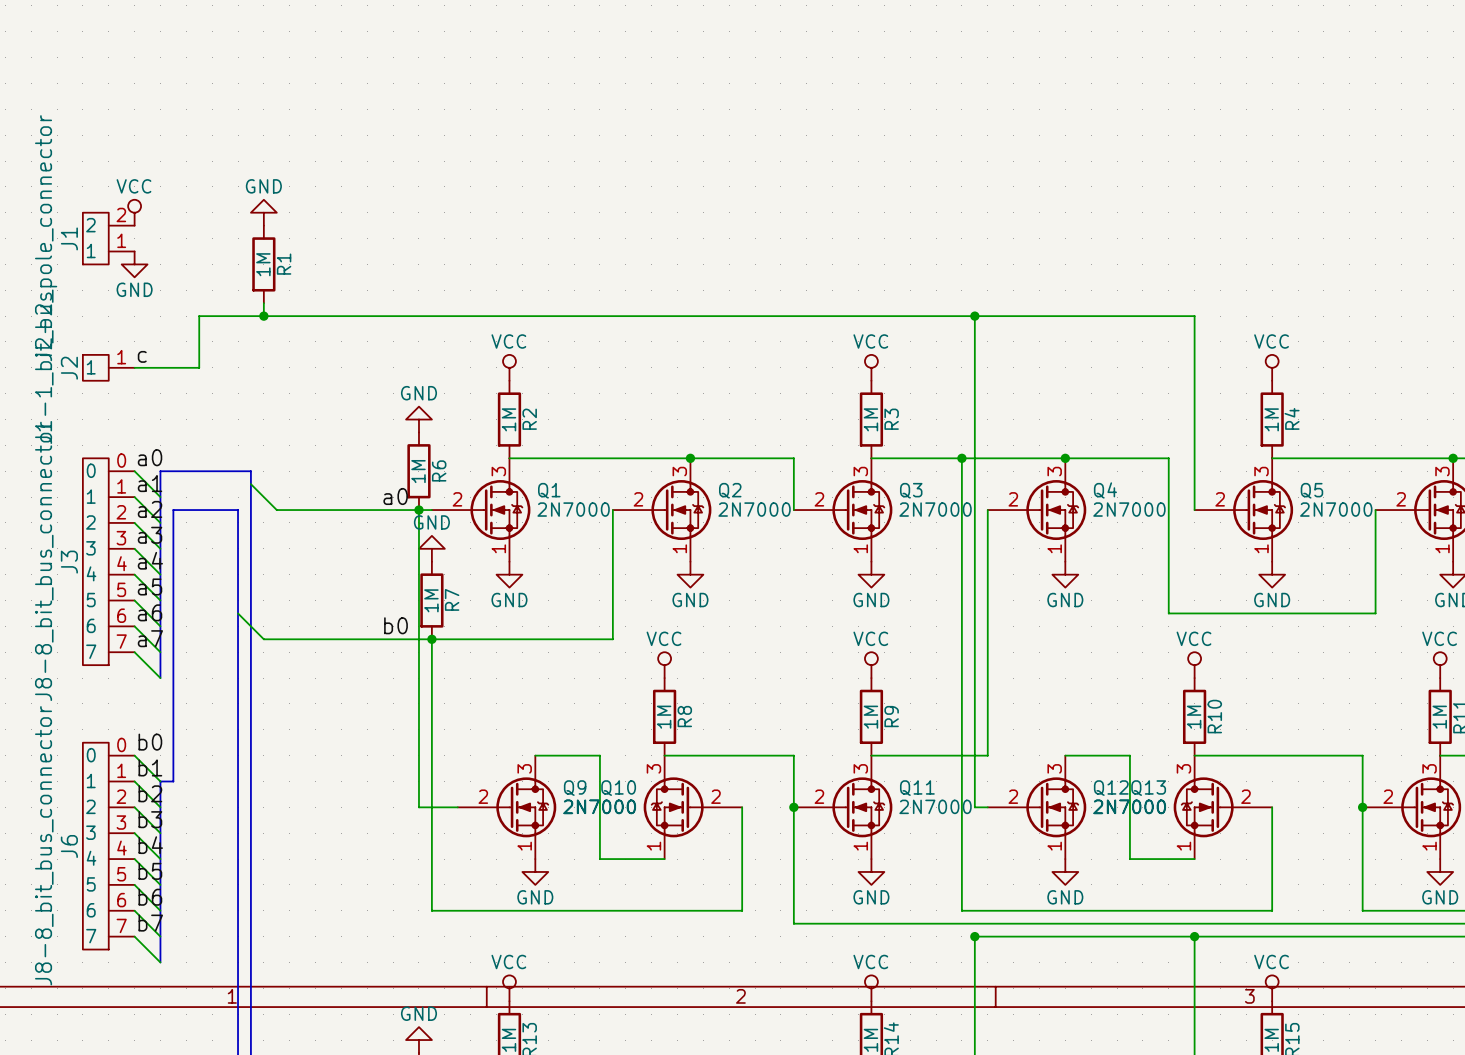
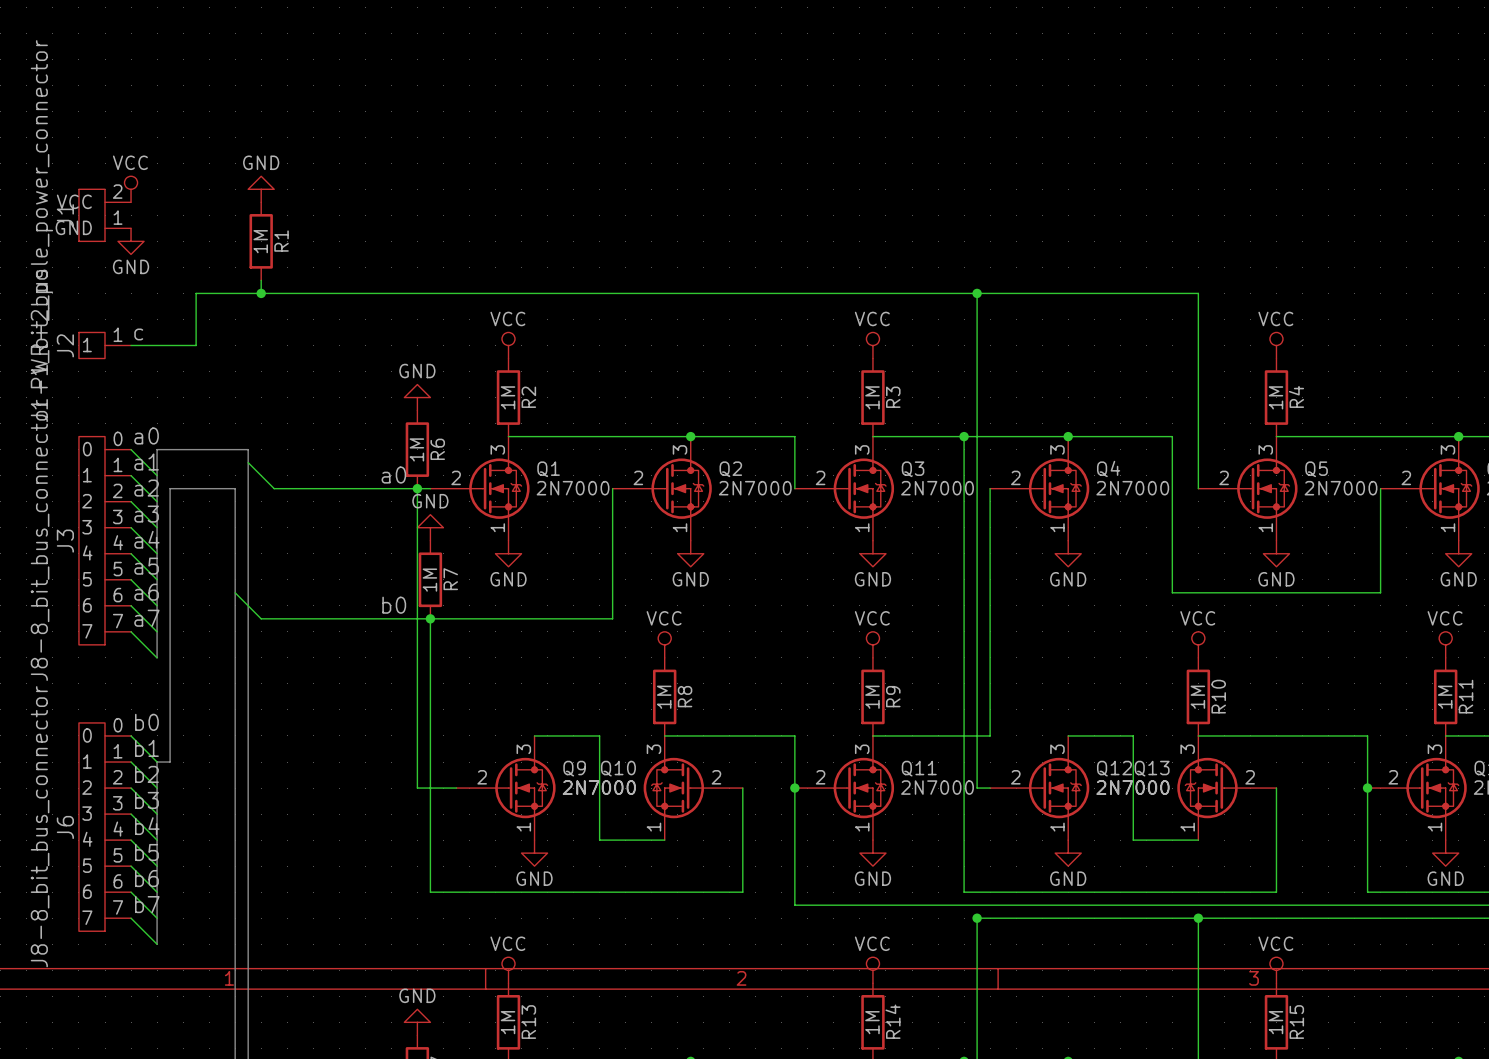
J1 pin name: 2 (90, 225) -> VCC (74, 201)
J1 value: J2-2_pole_connector (46, 238) -> PWR-2_pole_power_connector (41, 214)
J1 pin name: 1 (91, 251) -> GND (73, 227)

